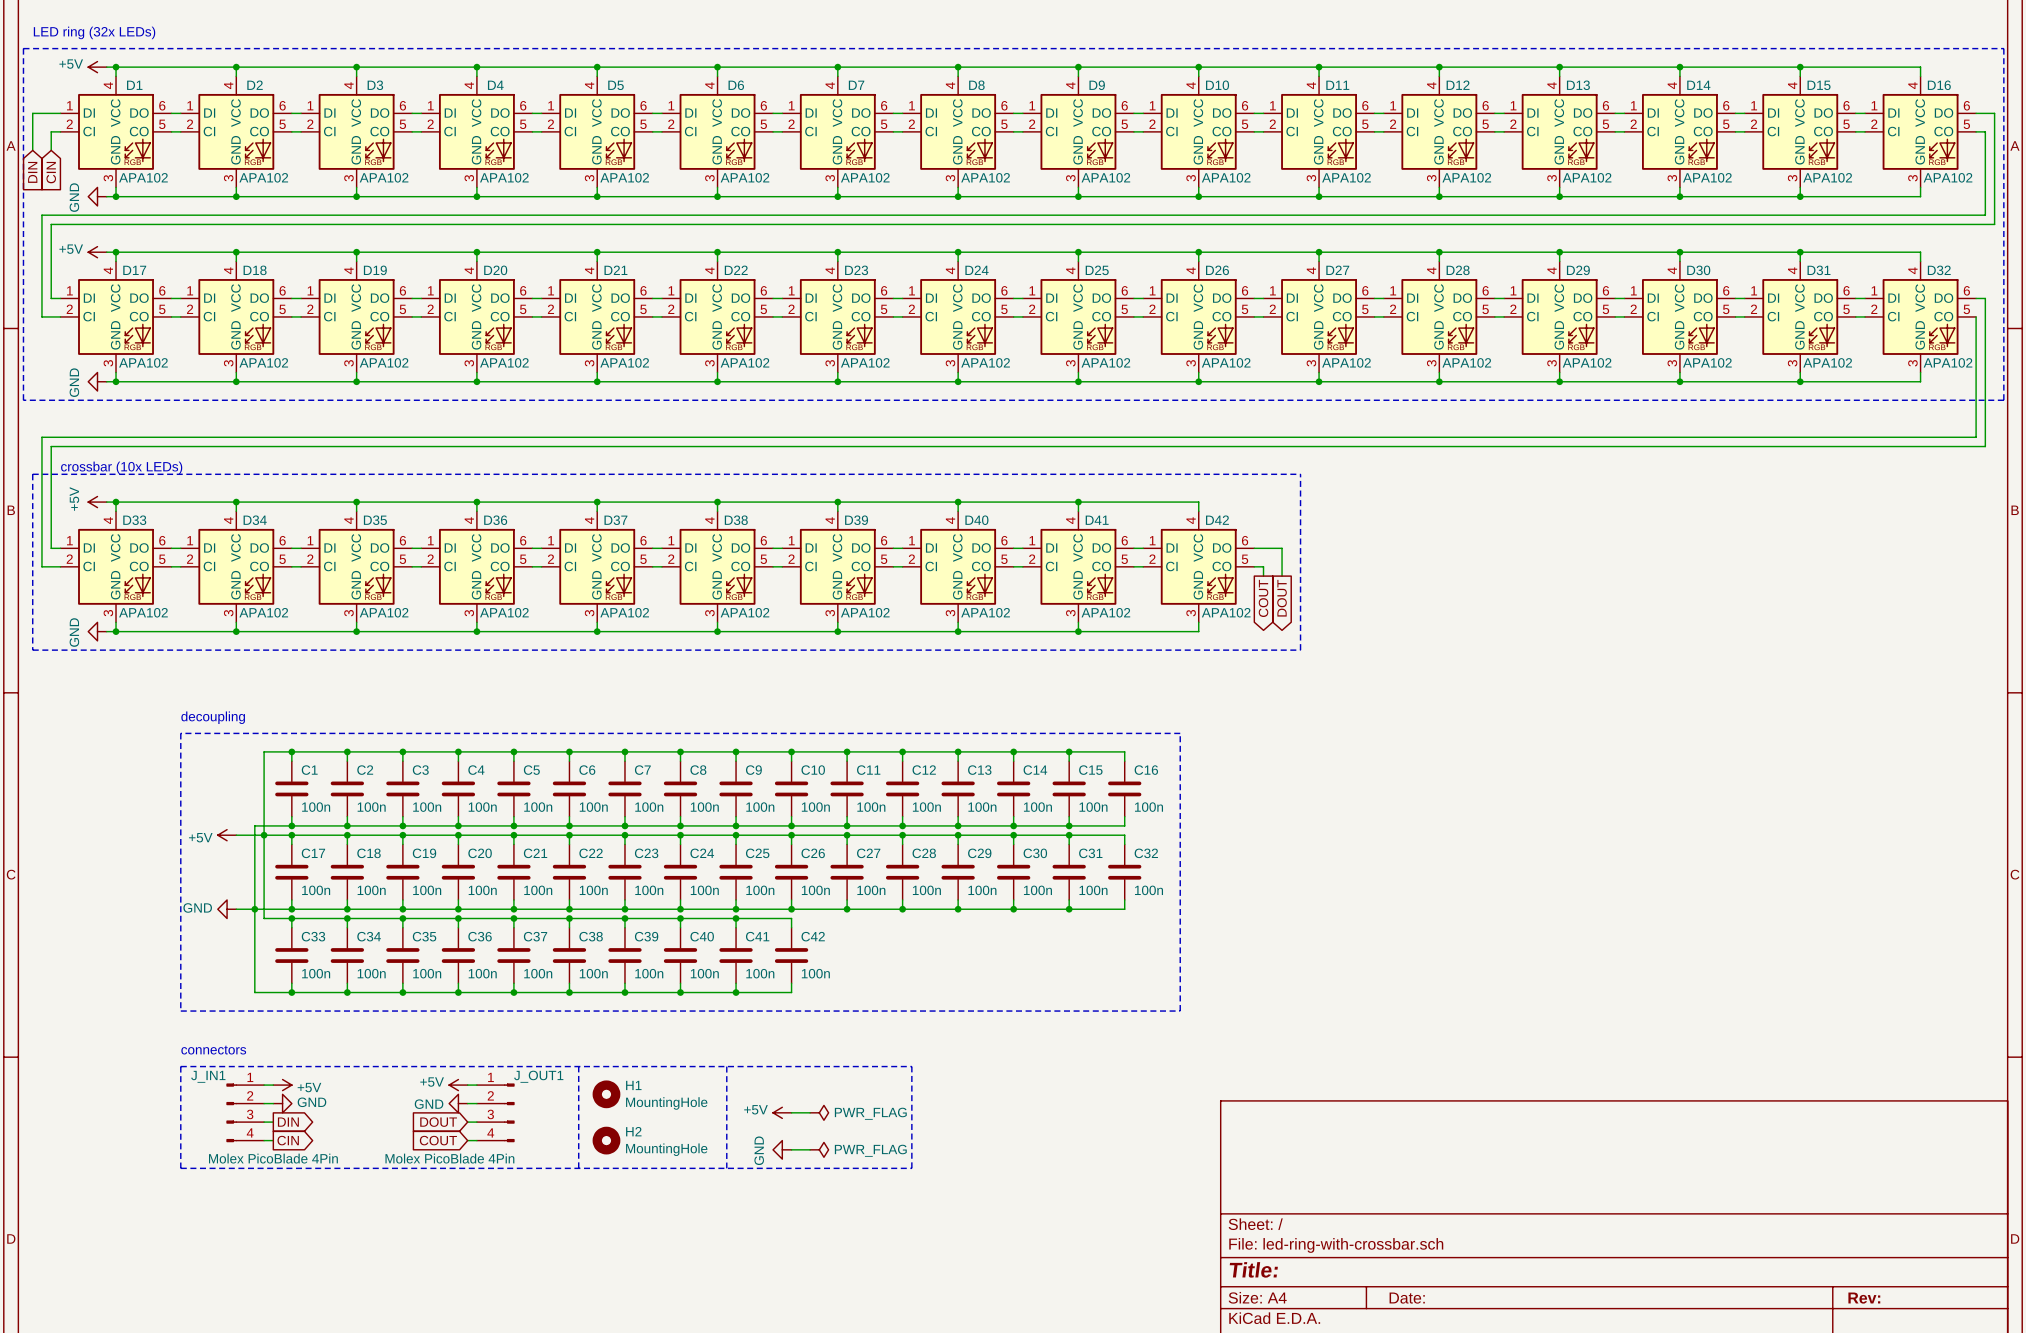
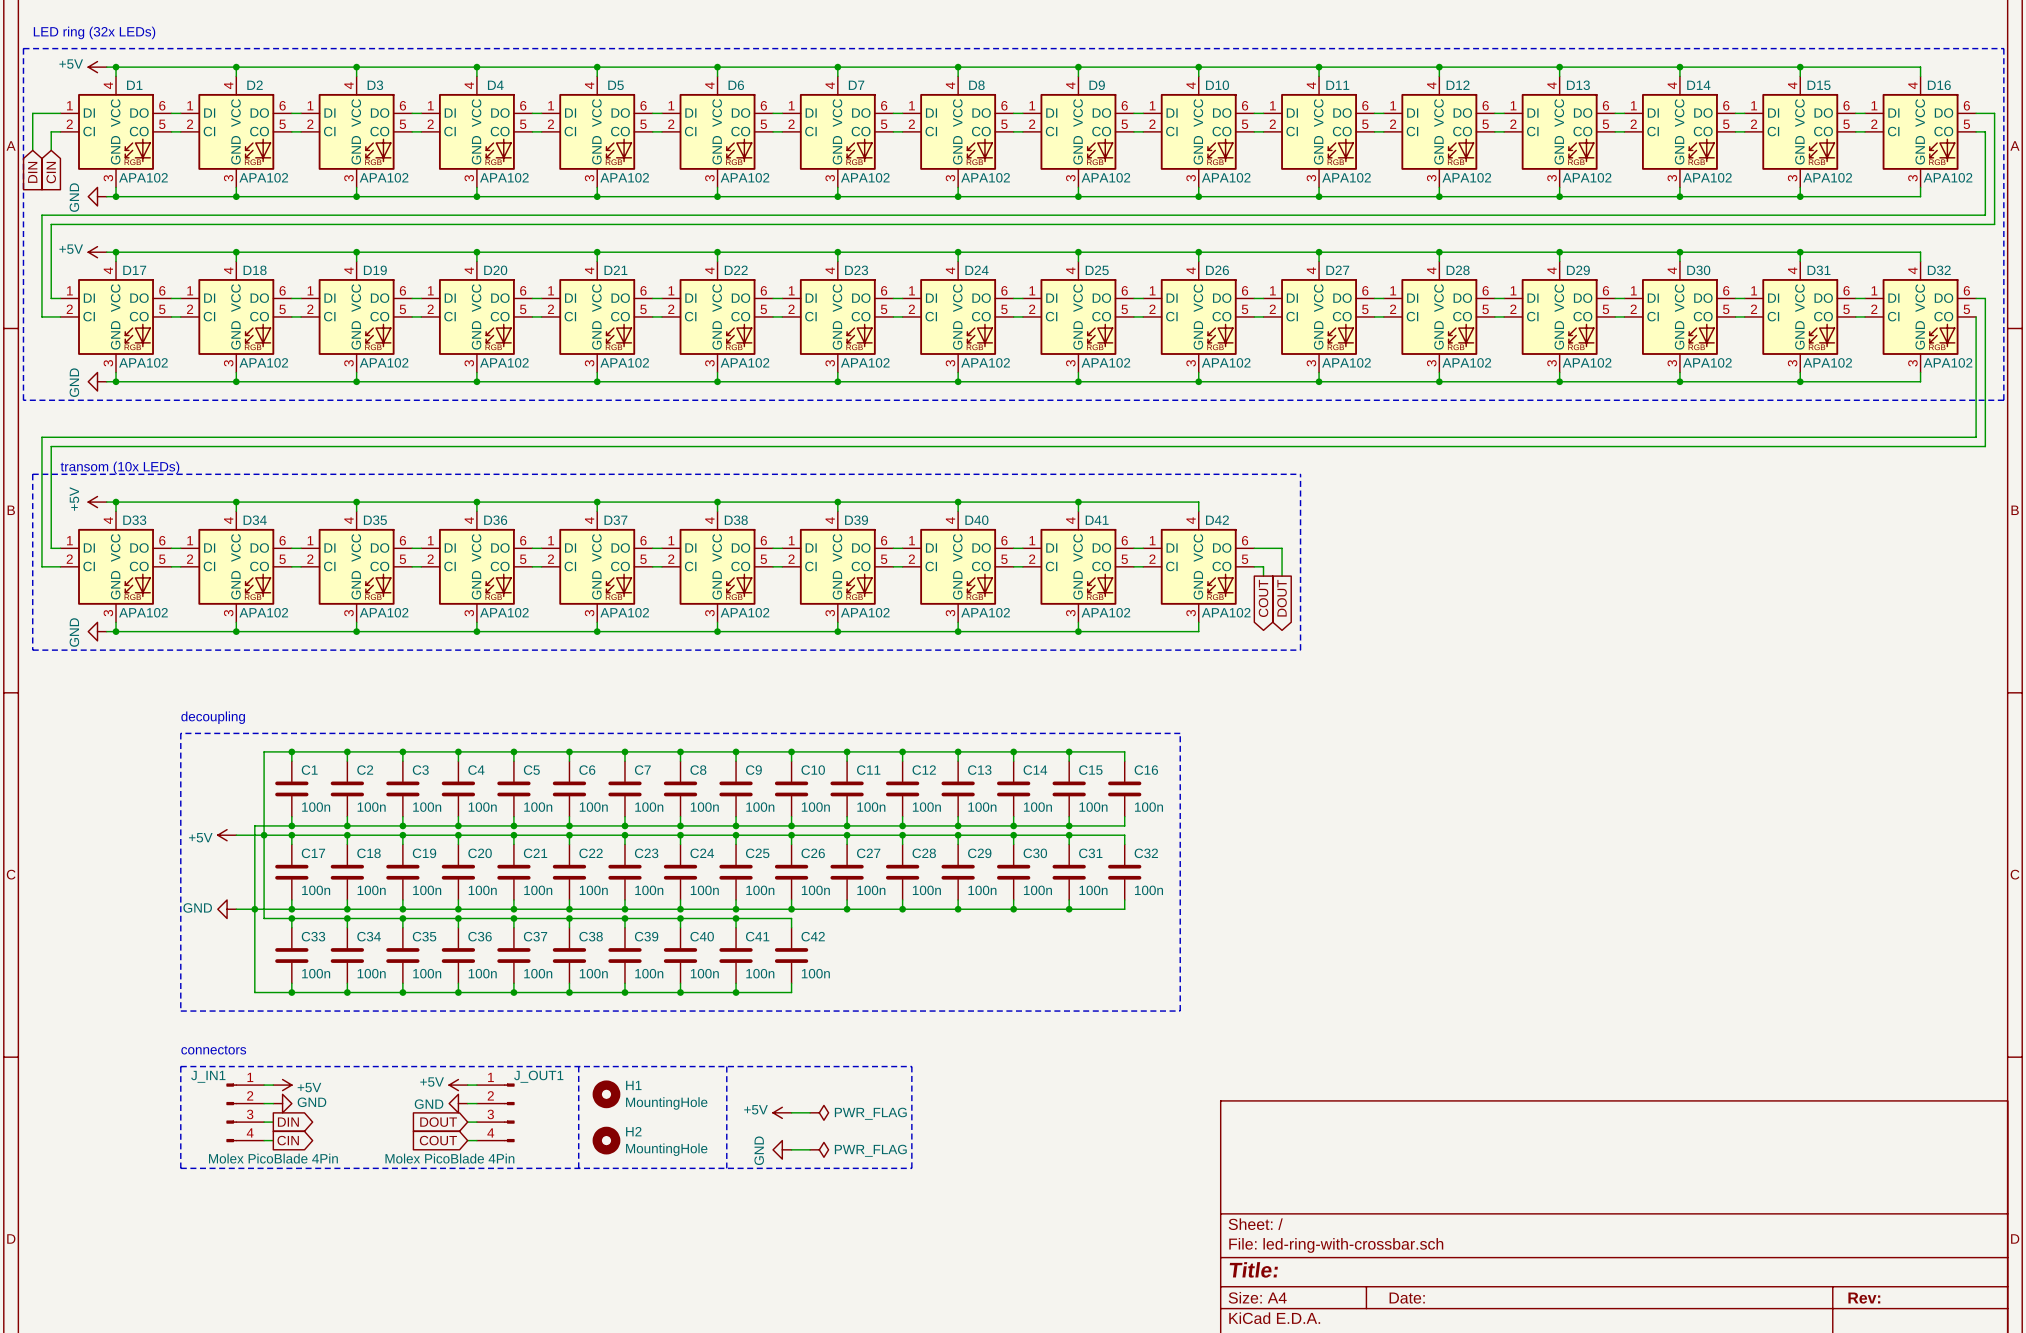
text: crossbar (10x LEDs) (121, 467) -> transom (10x LEDs) (119, 467)

